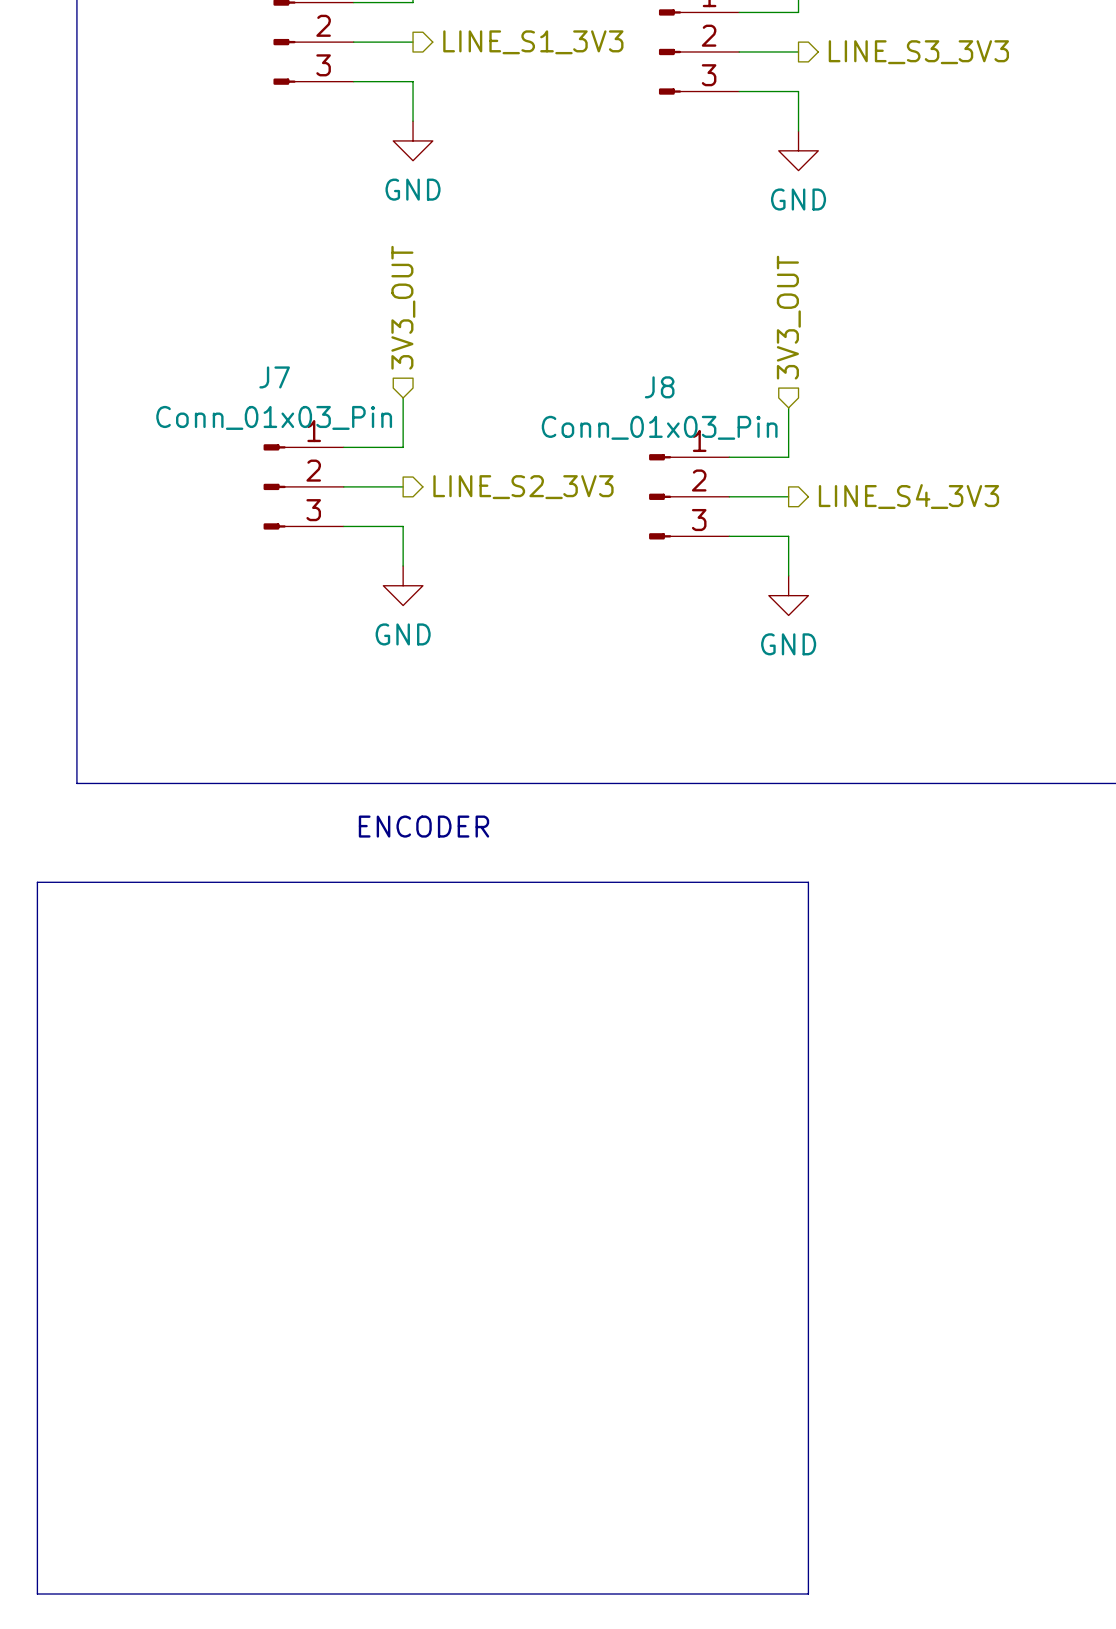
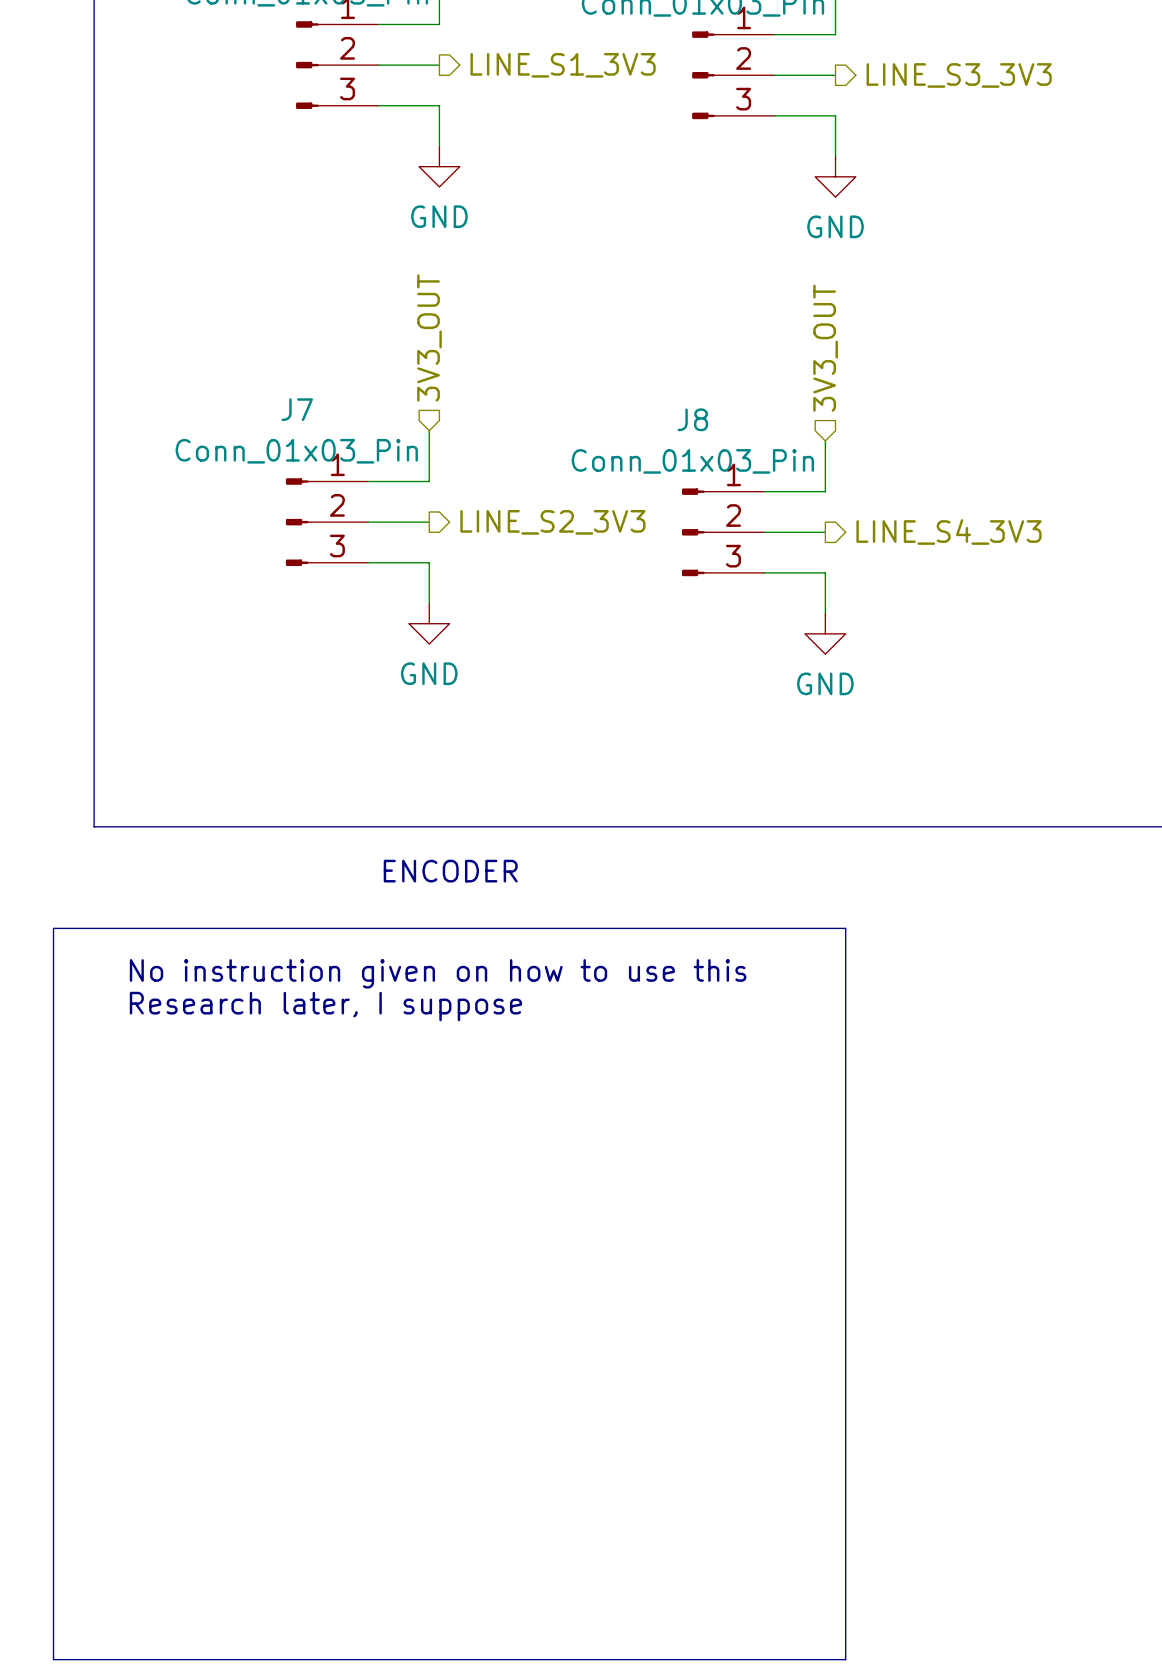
text: none -> No instruction given on how to use this (438, 973)
text: none -> Research later, I suppose (325, 1006)

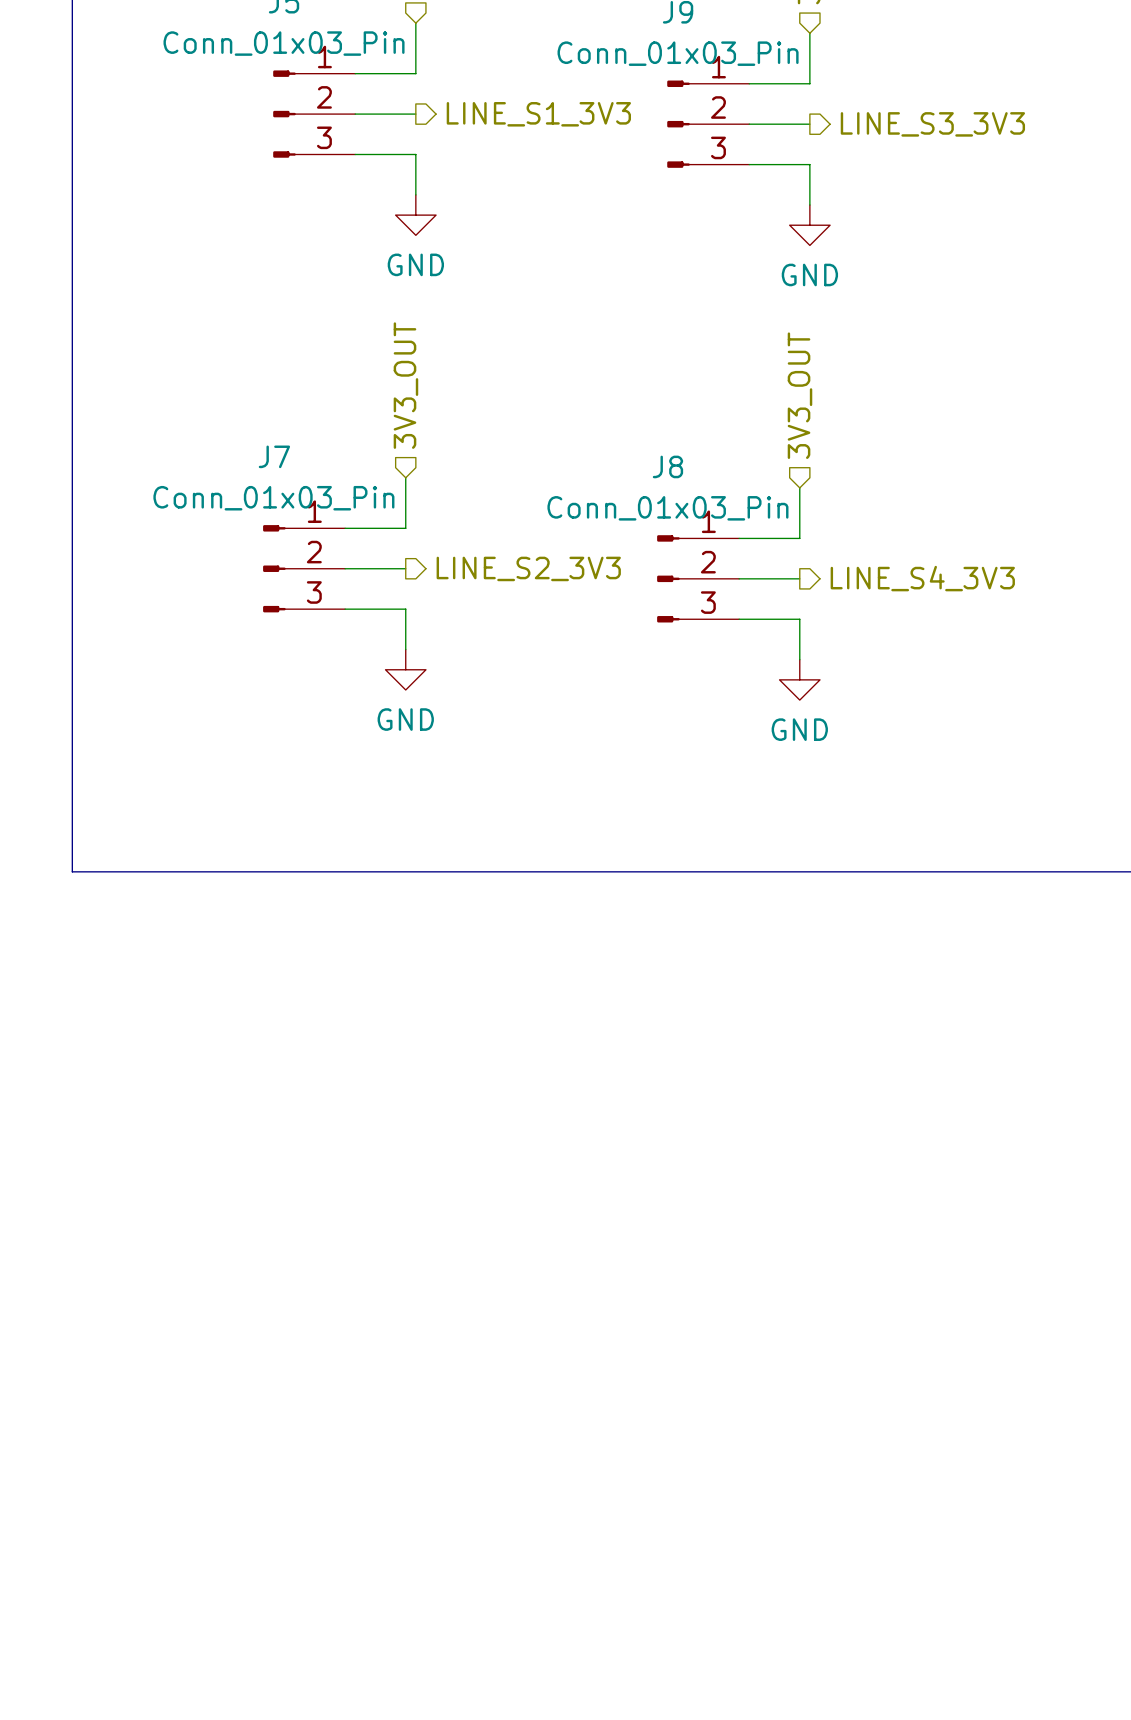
text: ENCODER (450, 871) -> none
line: (53, 928) (845, 928) (845, 1659) (53, 1659) (53, 928) -> none
text: No instruction given on how to use this (438, 973) -> none
text: Research later, I suppose (325, 1006) -> none

